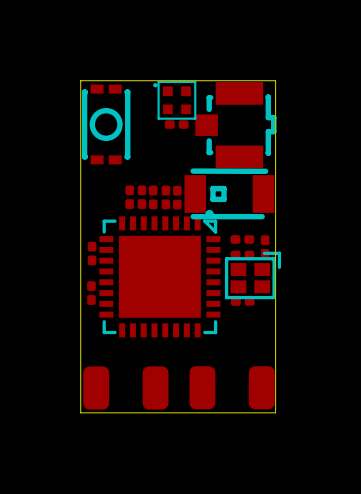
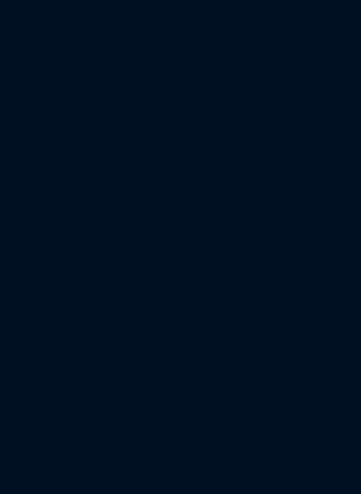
board edge: (80, 80) (275, 80) (275, 412) (80, 412) (80, 80) -> none
part: (174, 100) -> none
part: (106, 124) -> none
part: (176, 124) -> none
part: (235, 125) -> none
part: (229, 193) -> none
part: (129, 197) -> none
part: (141, 197) -> none
part: (153, 197) -> none
part: (165, 197) -> none
part: (177, 197) -> none
part: (242, 239) -> none
part: (265, 247) -> none
part: (92, 253) -> none
part: (242, 255) -> none
part: (159, 273) -> none
part: (253, 275) -> none
part: (91, 293) -> none
part: (242, 301) -> none
part: (202, 387) -> none
part: (261, 387) -> none
part: (96, 388) -> none
part: (155, 388) -> none

